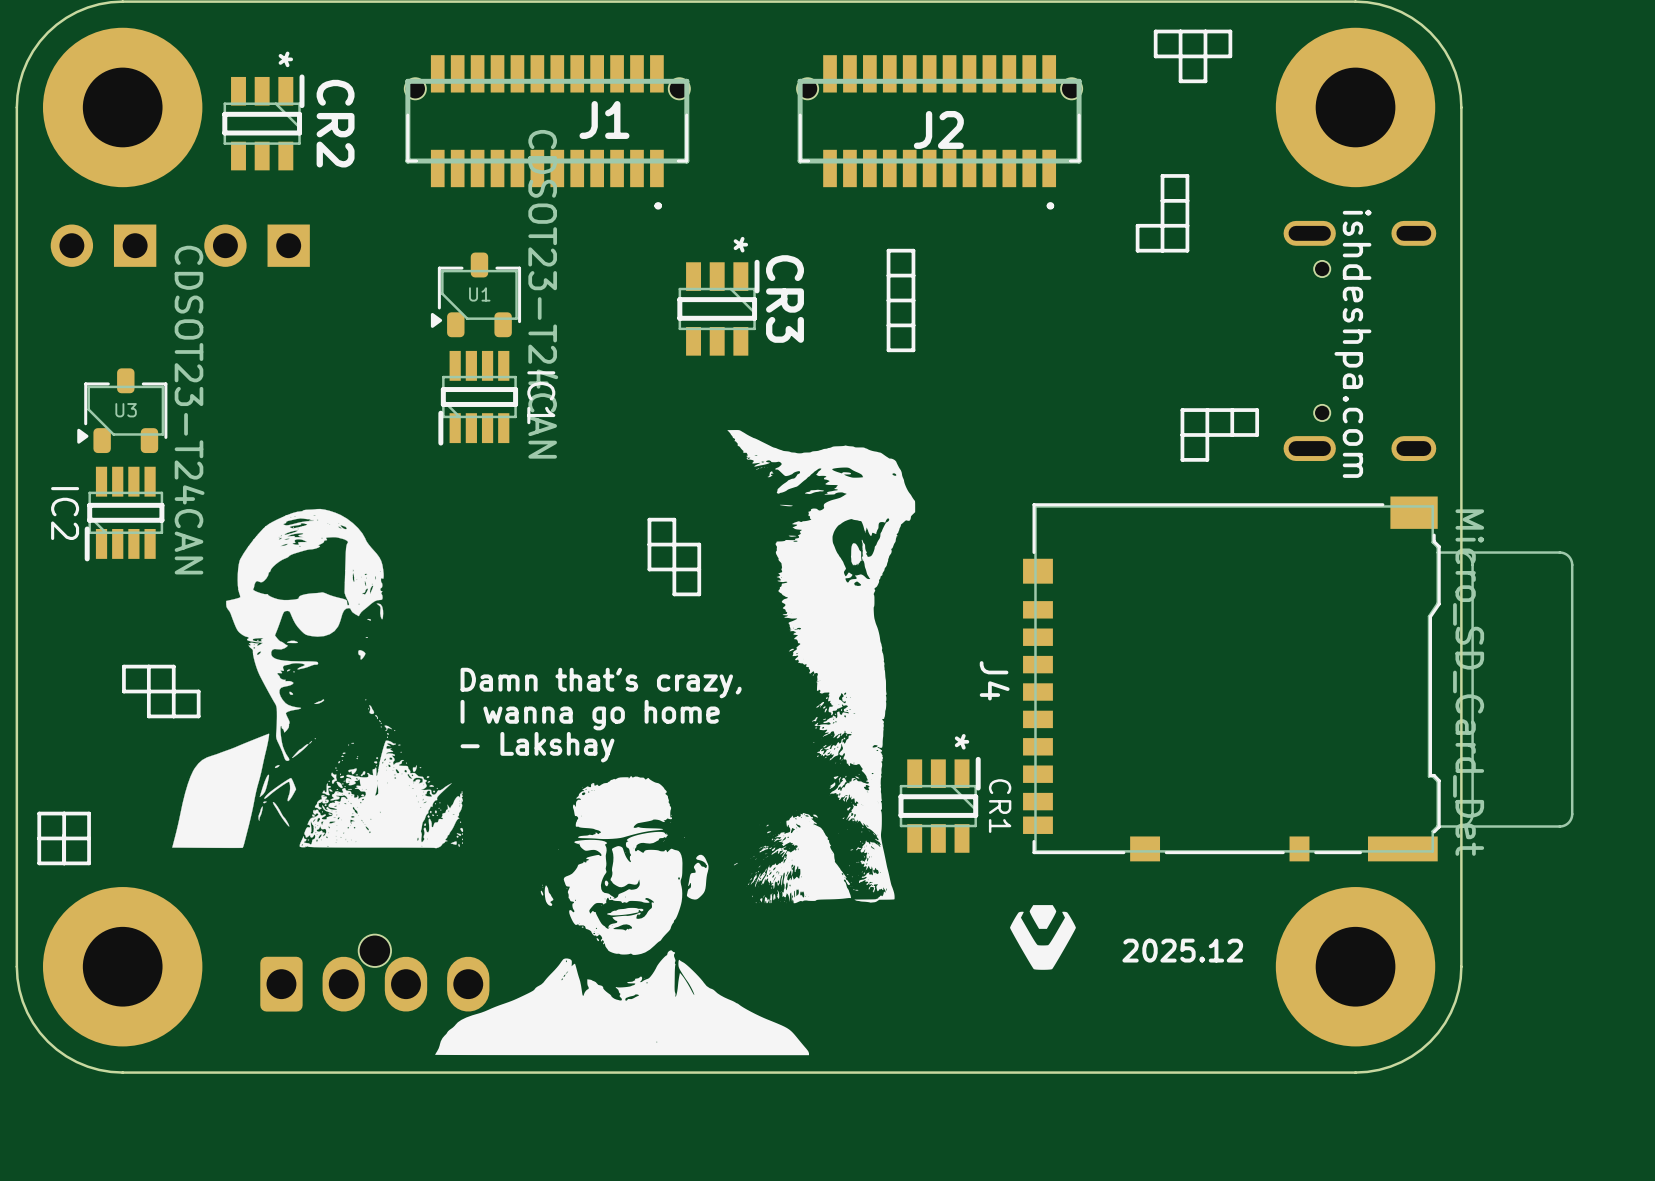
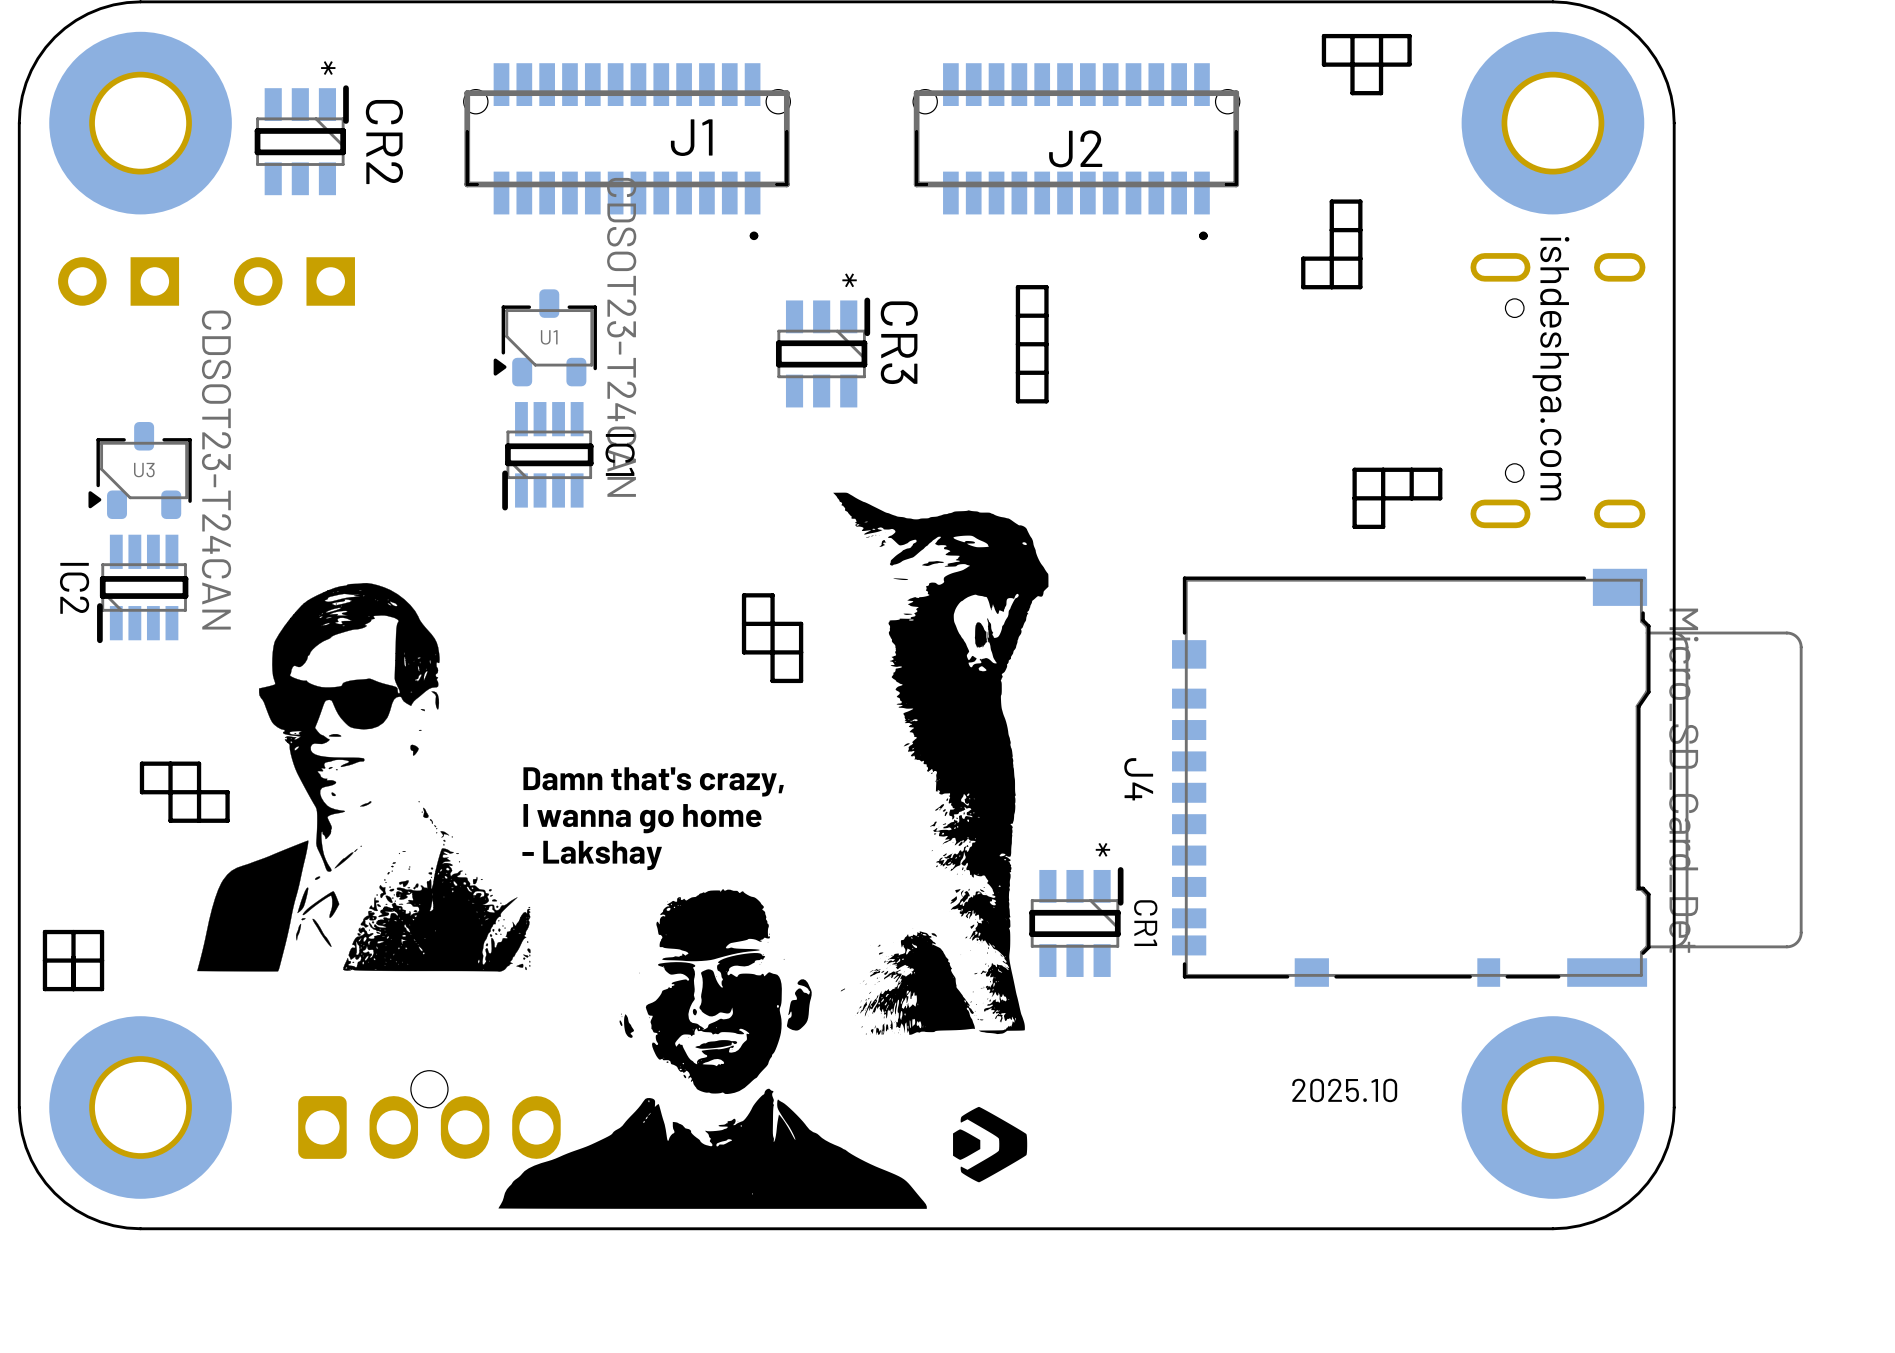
drawing: [1010, 905, 1076, 970] -> none
text: 2025.12 (1182, 950) -> 2025.10 (1344, 1090)
drawing: none -> [953, 1106, 1028, 1183]

